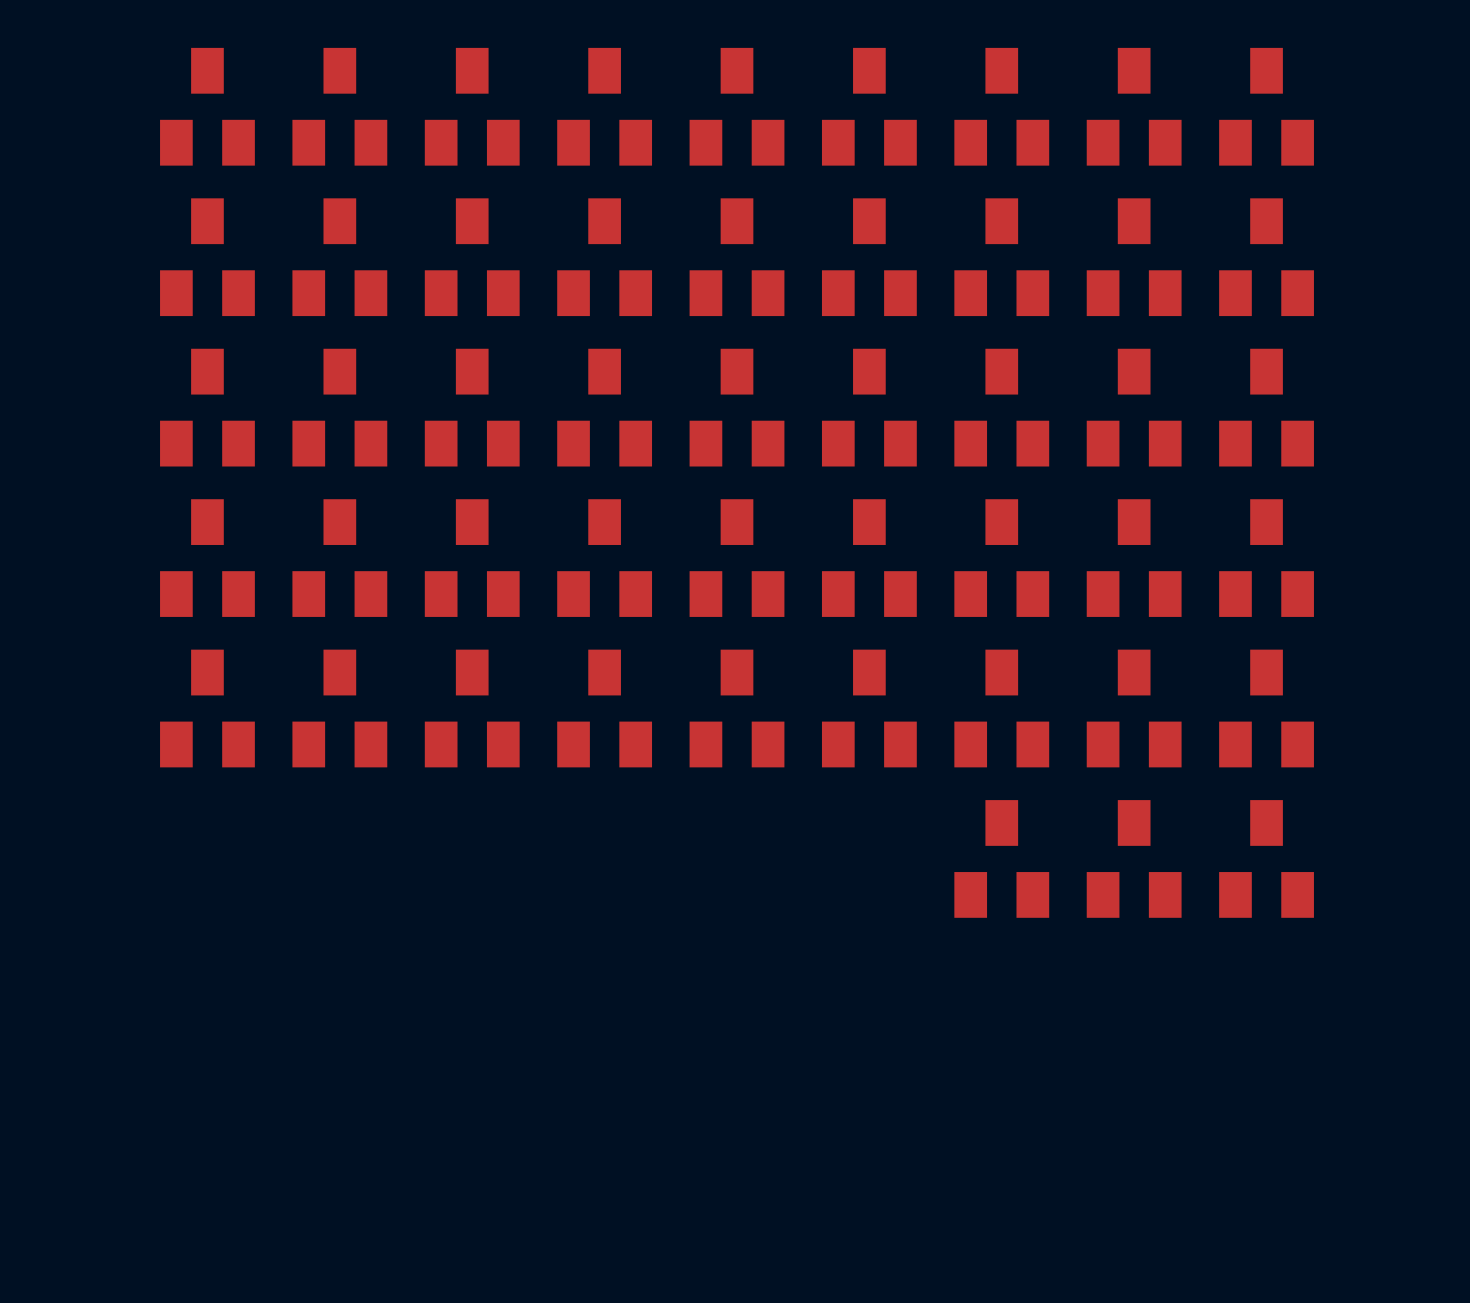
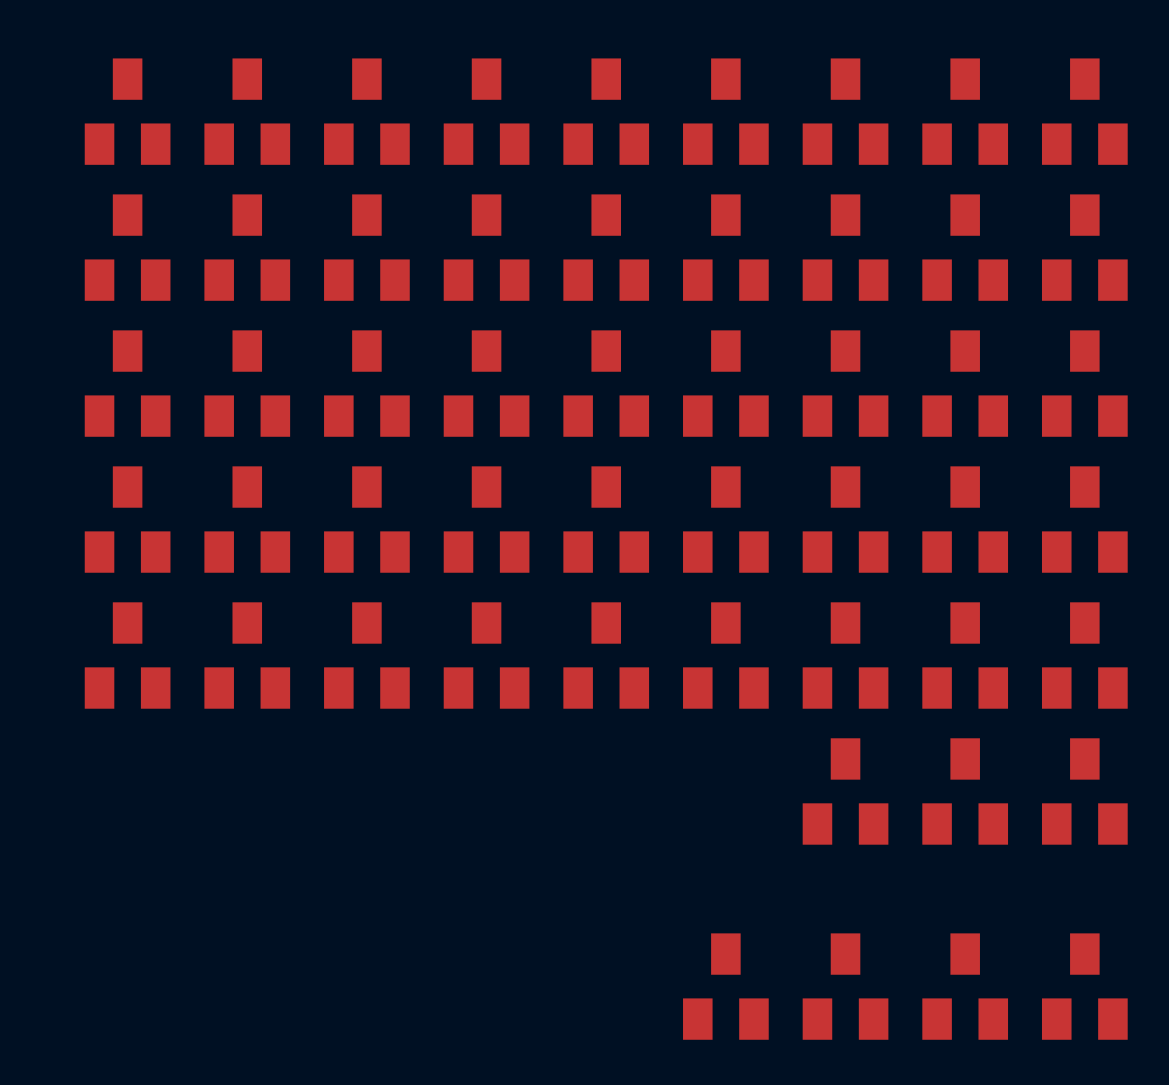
part: none -> (725, 986)
part: none -> (845, 986)
part: none -> (965, 986)
part: none -> (1084, 986)

